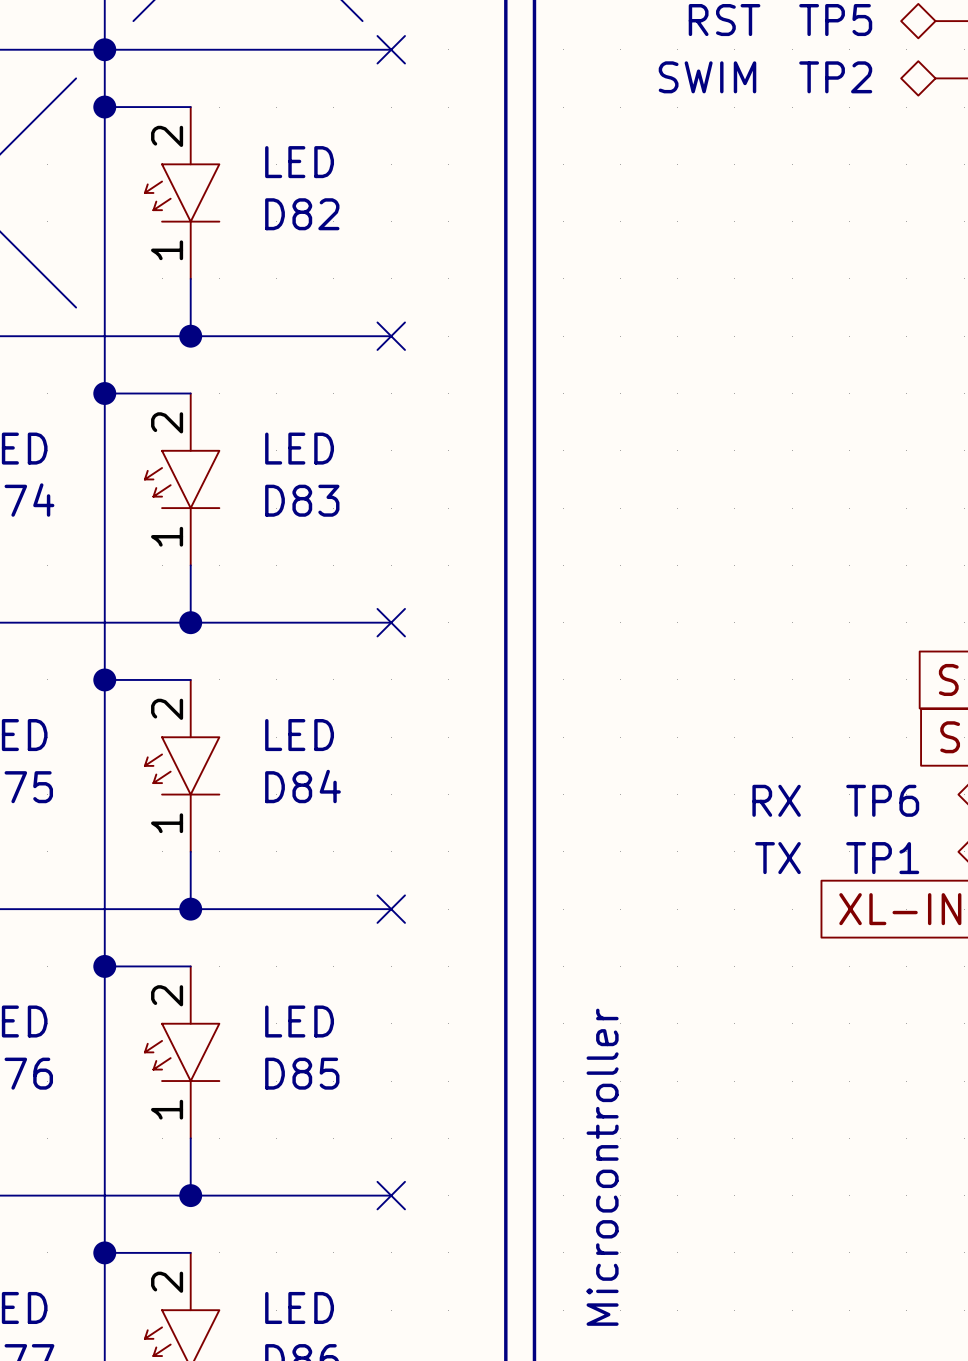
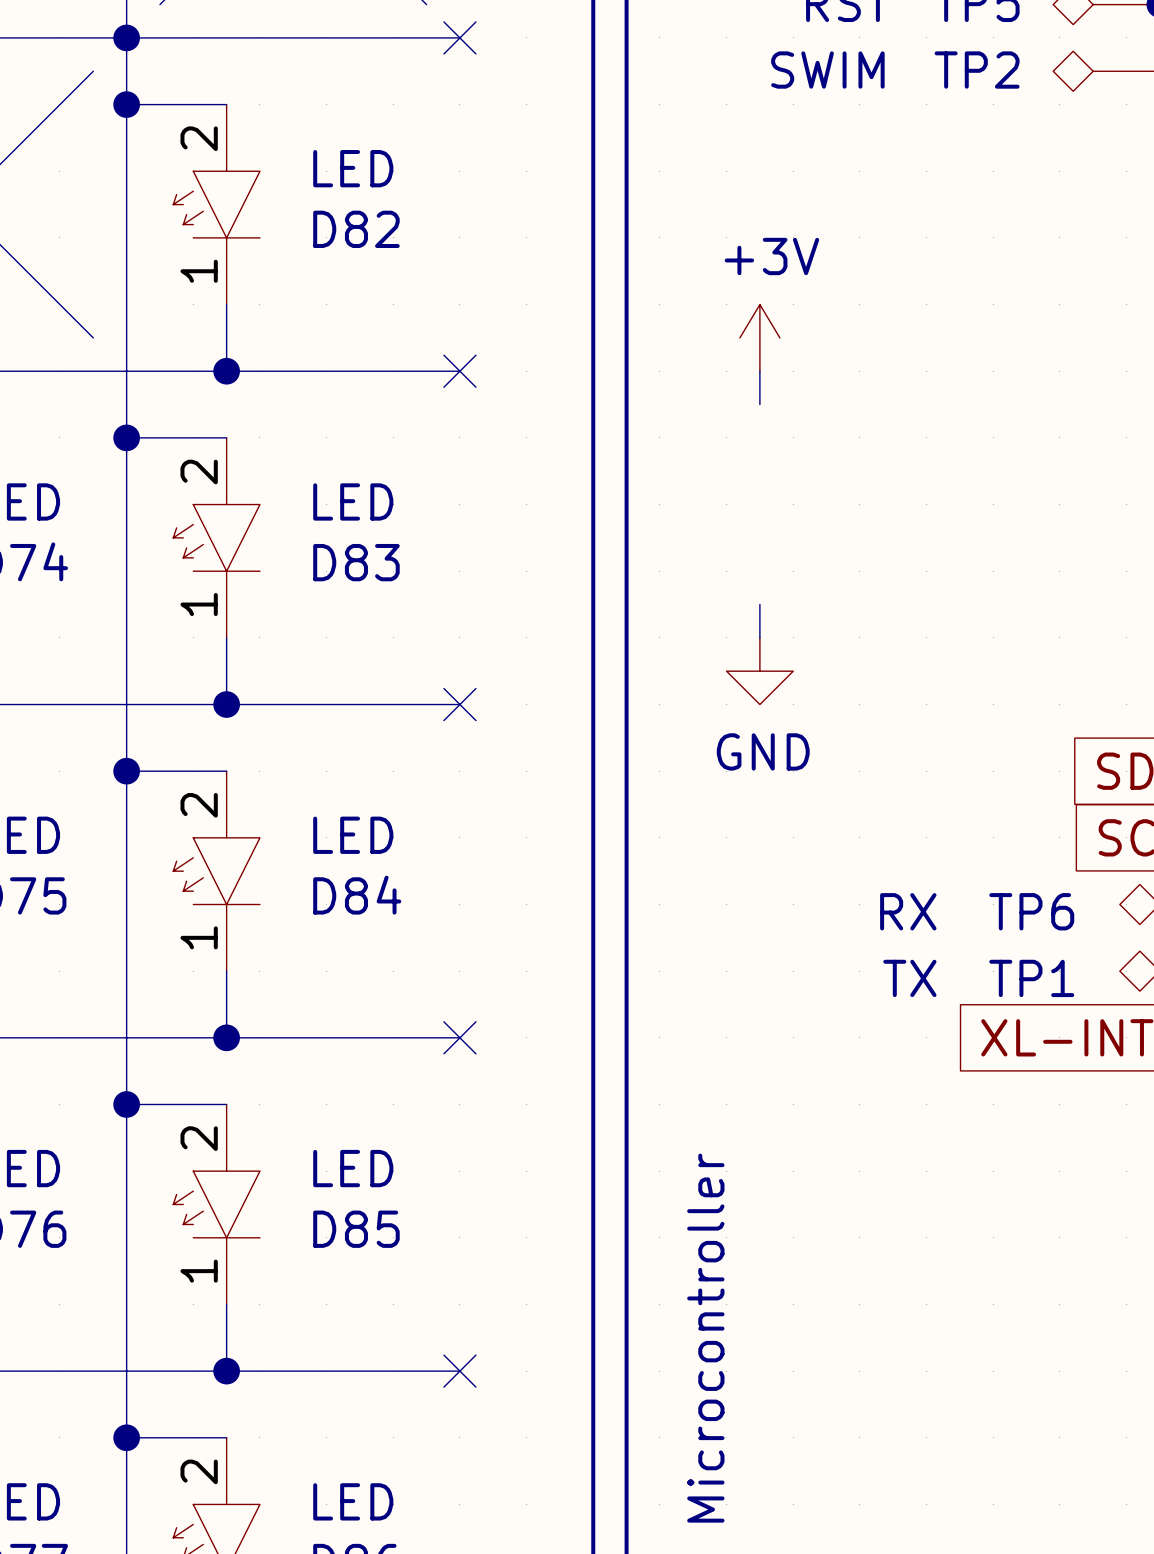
power symbol: none -> +3V (759, 337)
wire: none -> (759, 371) (759, 404)
wire: none -> (759, 604) (759, 637)
power symbol: none -> GND (759, 671)

